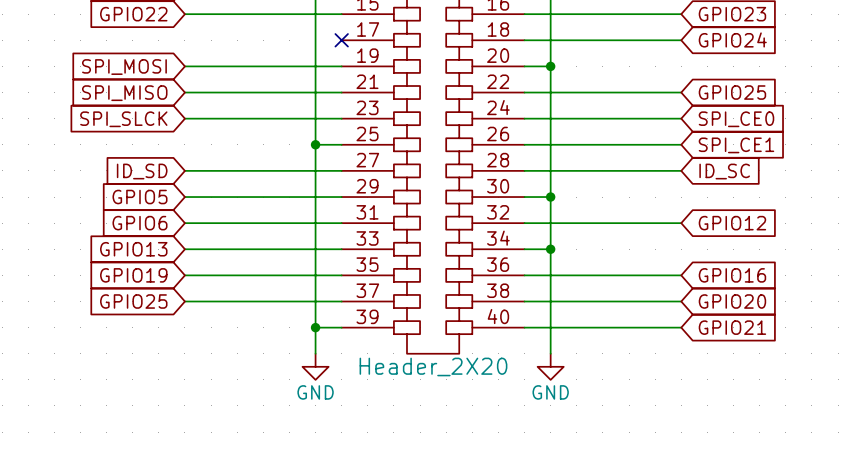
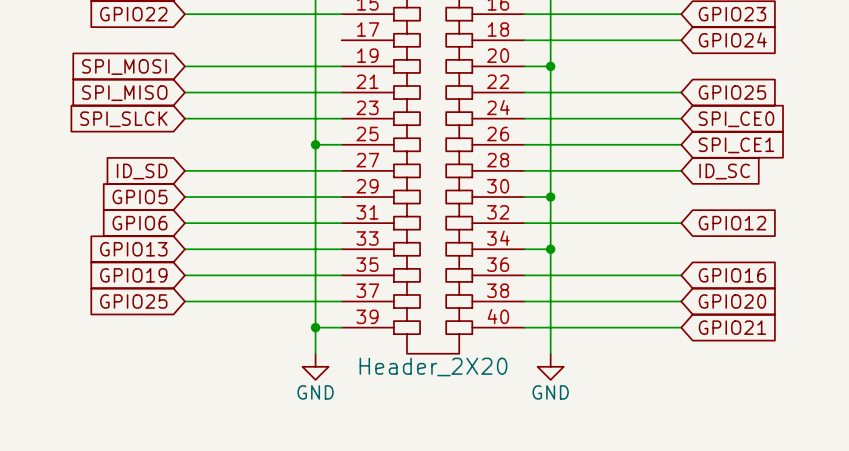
no-connect mark: (341, 40) -> none

